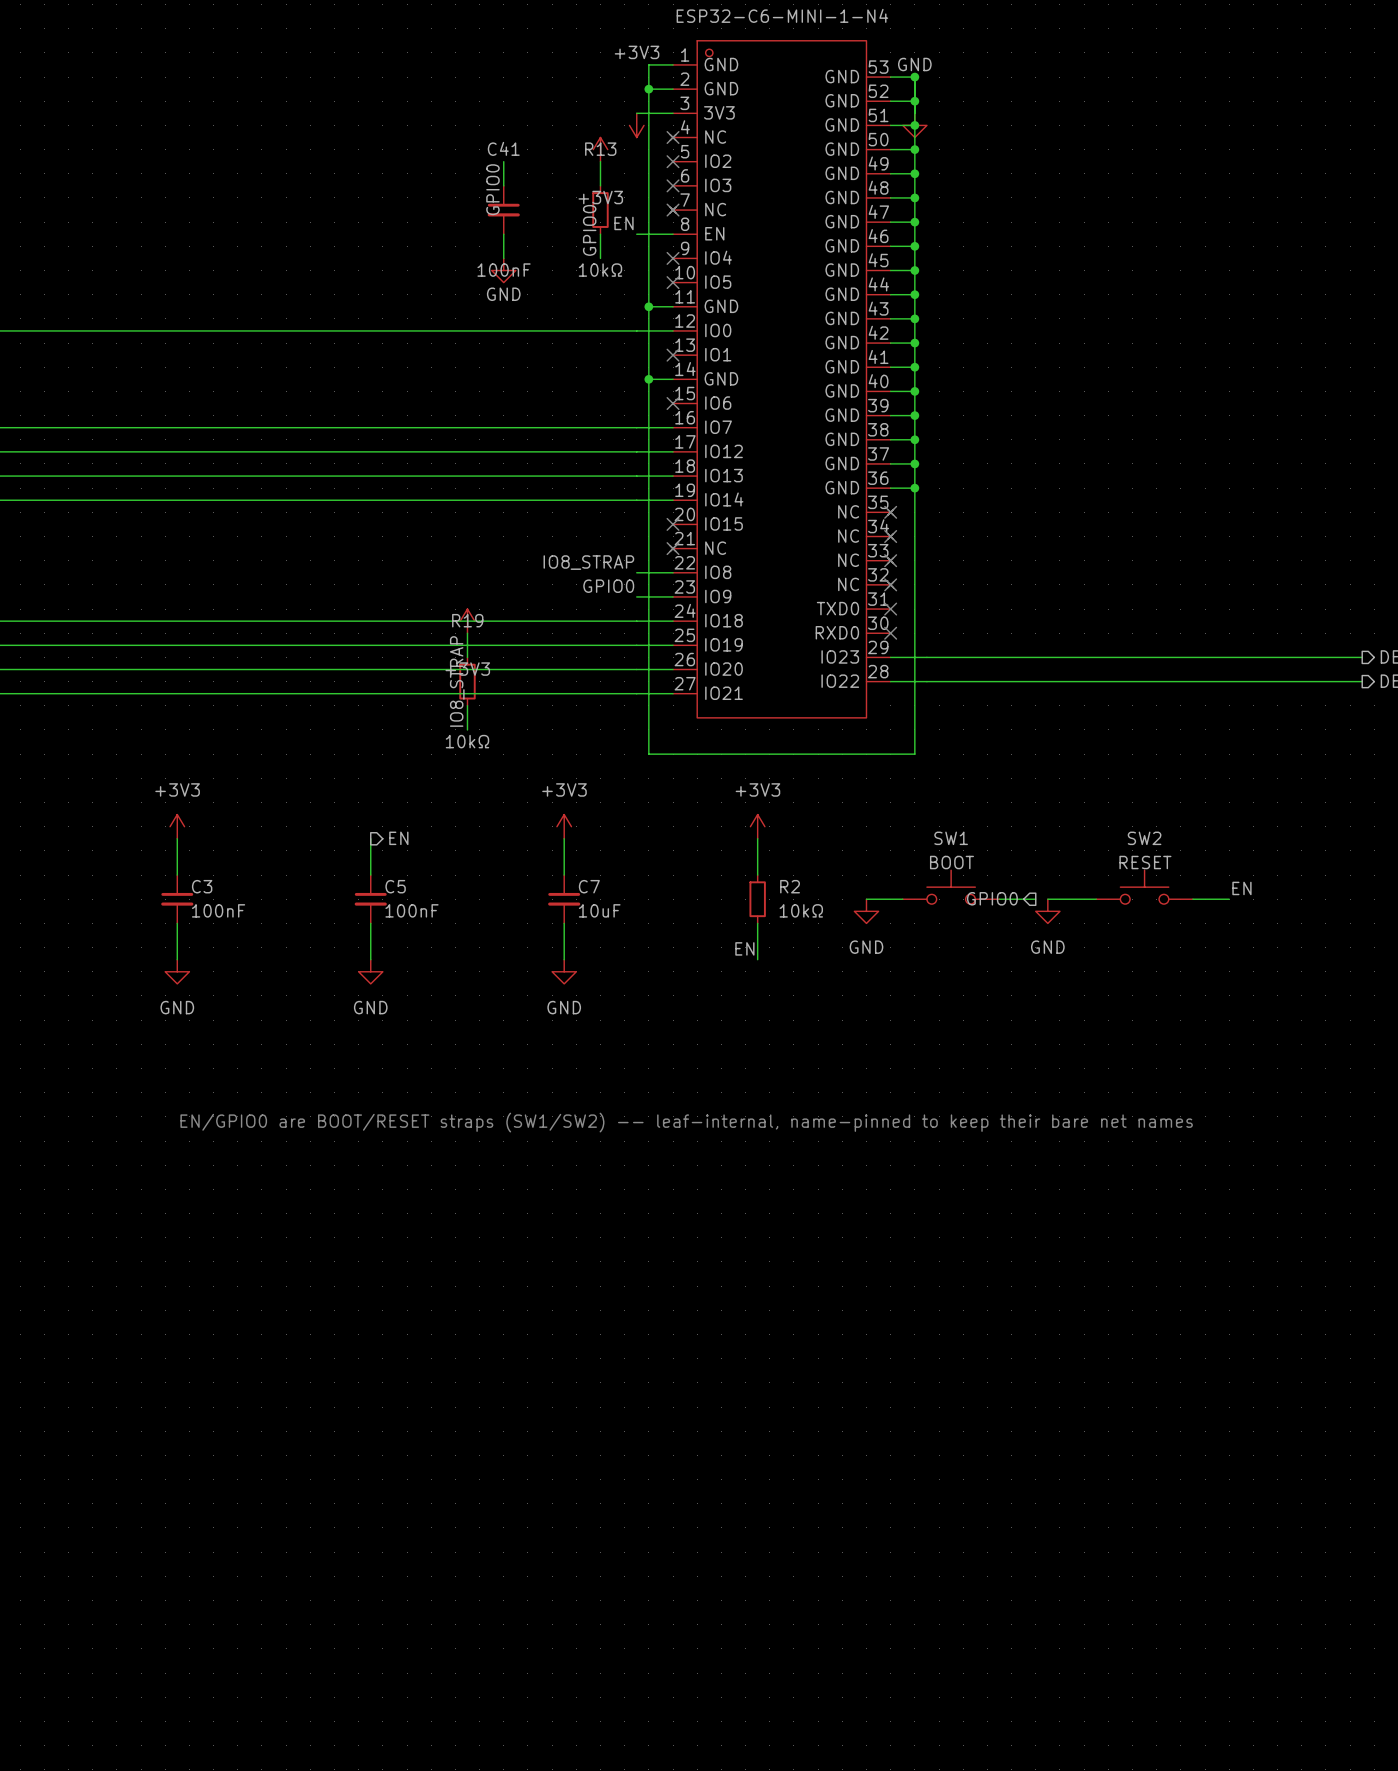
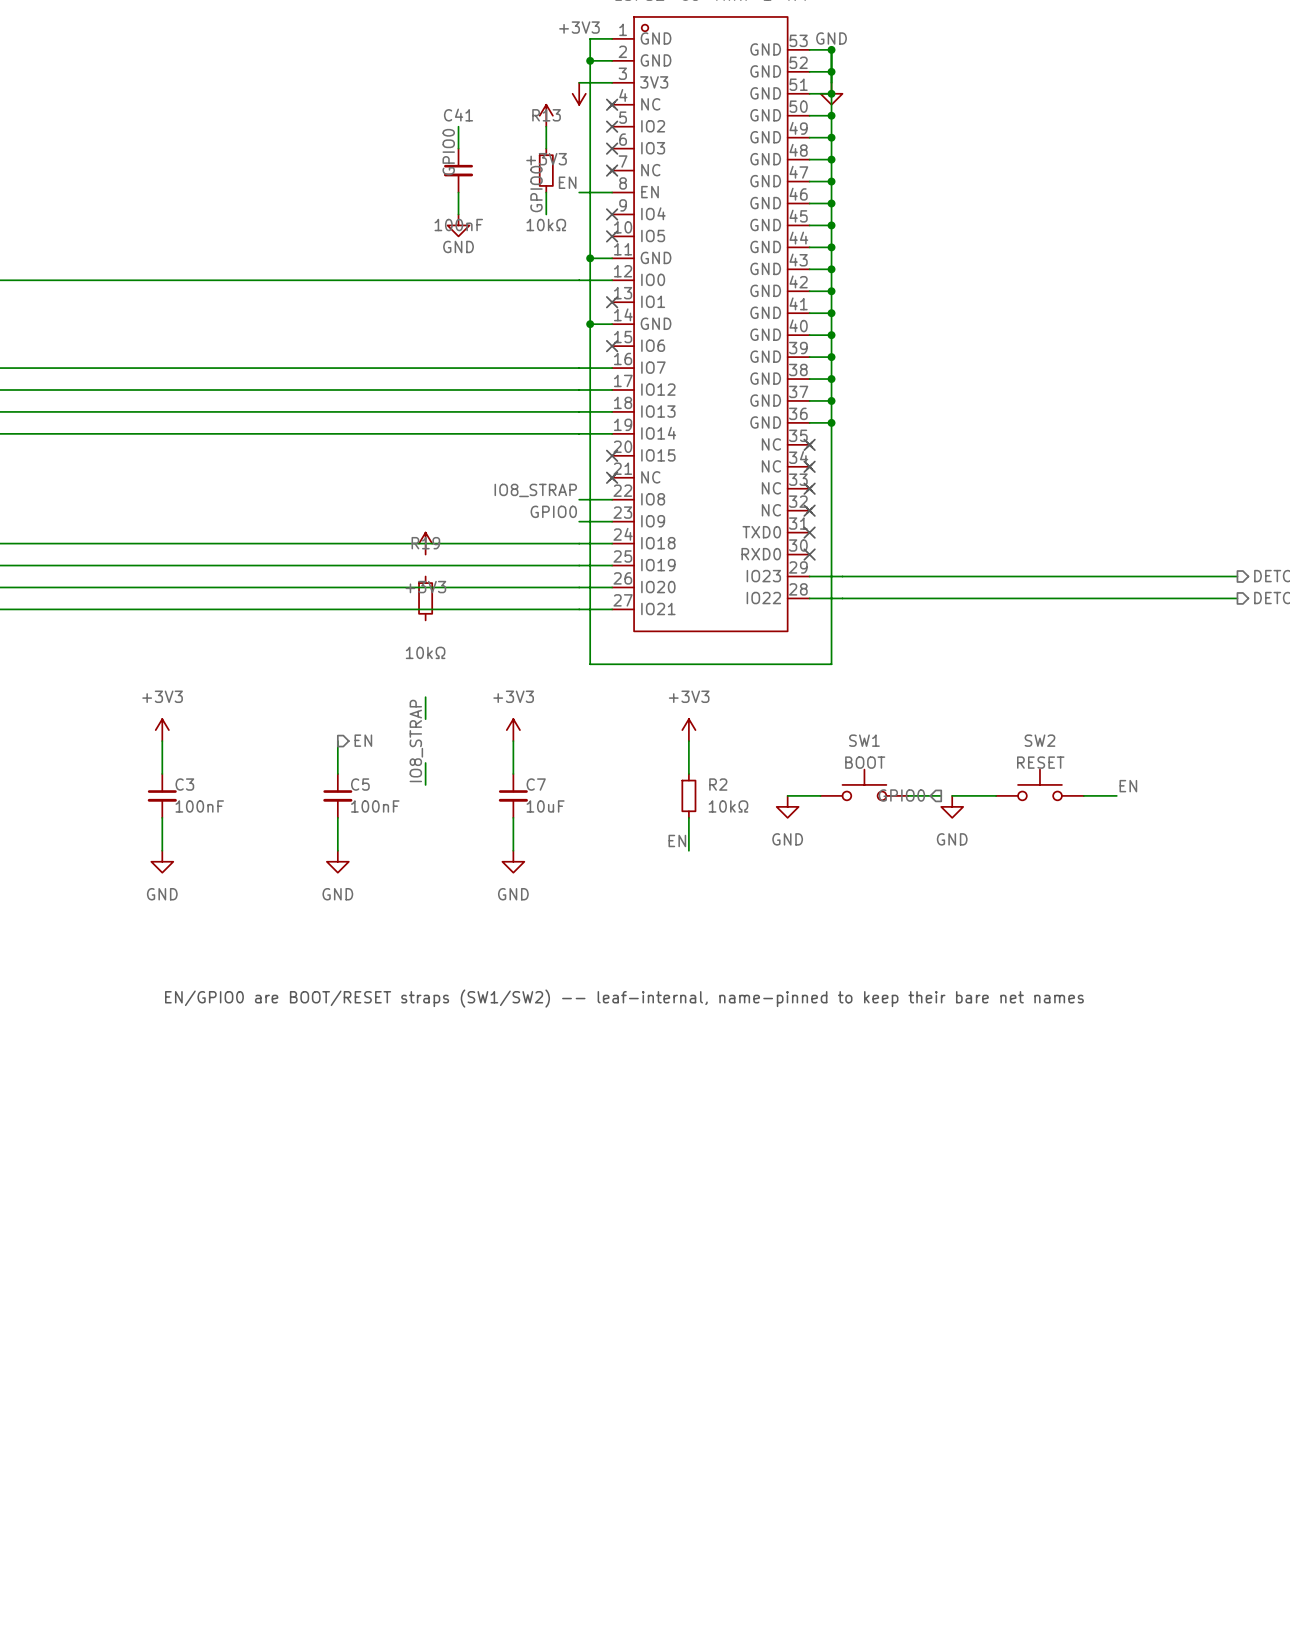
wire: (467, 633) (467, 657) -> (425, 697) (425, 719)
label position: IO8_STRAP (457, 681) -> IO8_STRAP (416, 740)
wire: (467, 705) (467, 729) -> (425, 763) (425, 784)

